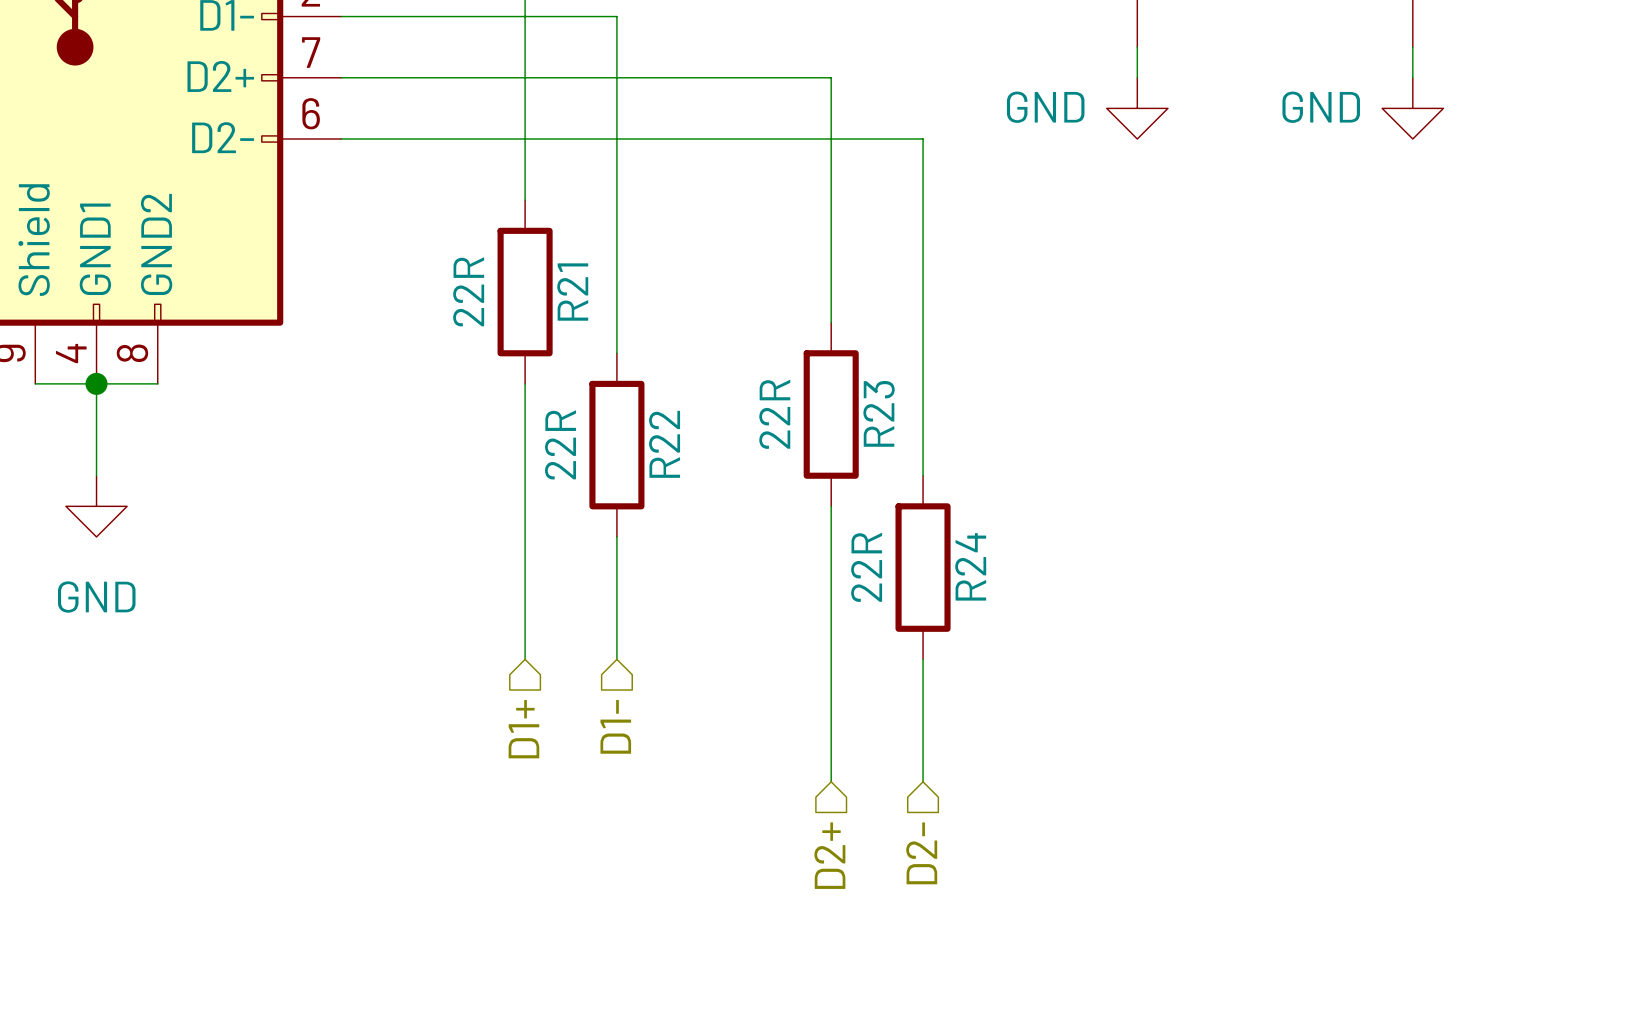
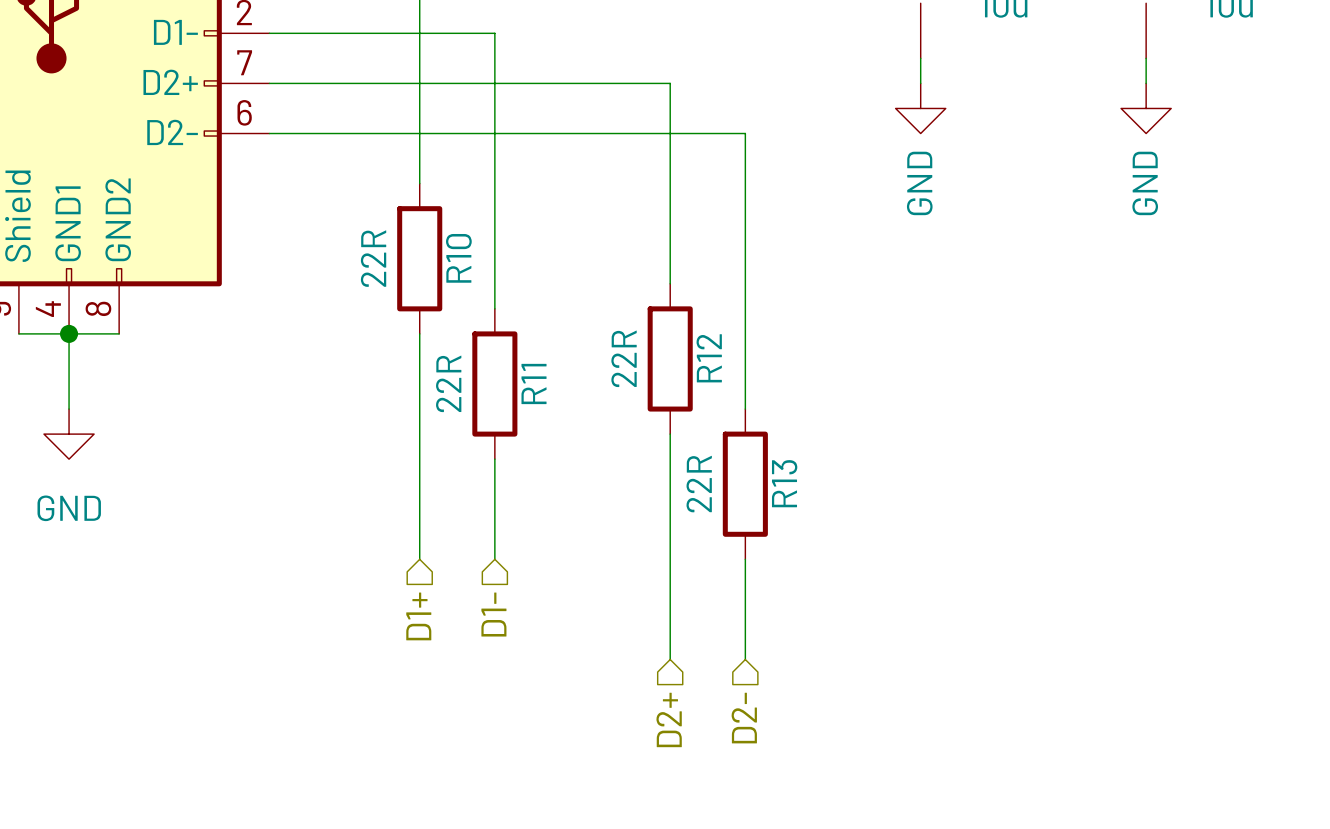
power symbol text rotation: 0° (1045, 107) -> 90° counterclockwise (919, 183)
power symbol text position: GND (1045, 107) -> GND (919, 183)
power symbol text rotation: 0° (1321, 107) -> 90° counterclockwise (1145, 183)
power symbol text position: GND (1321, 107) -> GND (1145, 183)
R21 name: R21 (572, 292) -> R10 (458, 258)
R23 name: R23 (879, 413) -> R12 (709, 358)
R22 name: R22 (664, 444) -> R11 (534, 383)
R24 name: R24 (970, 566) -> R13 (784, 483)

